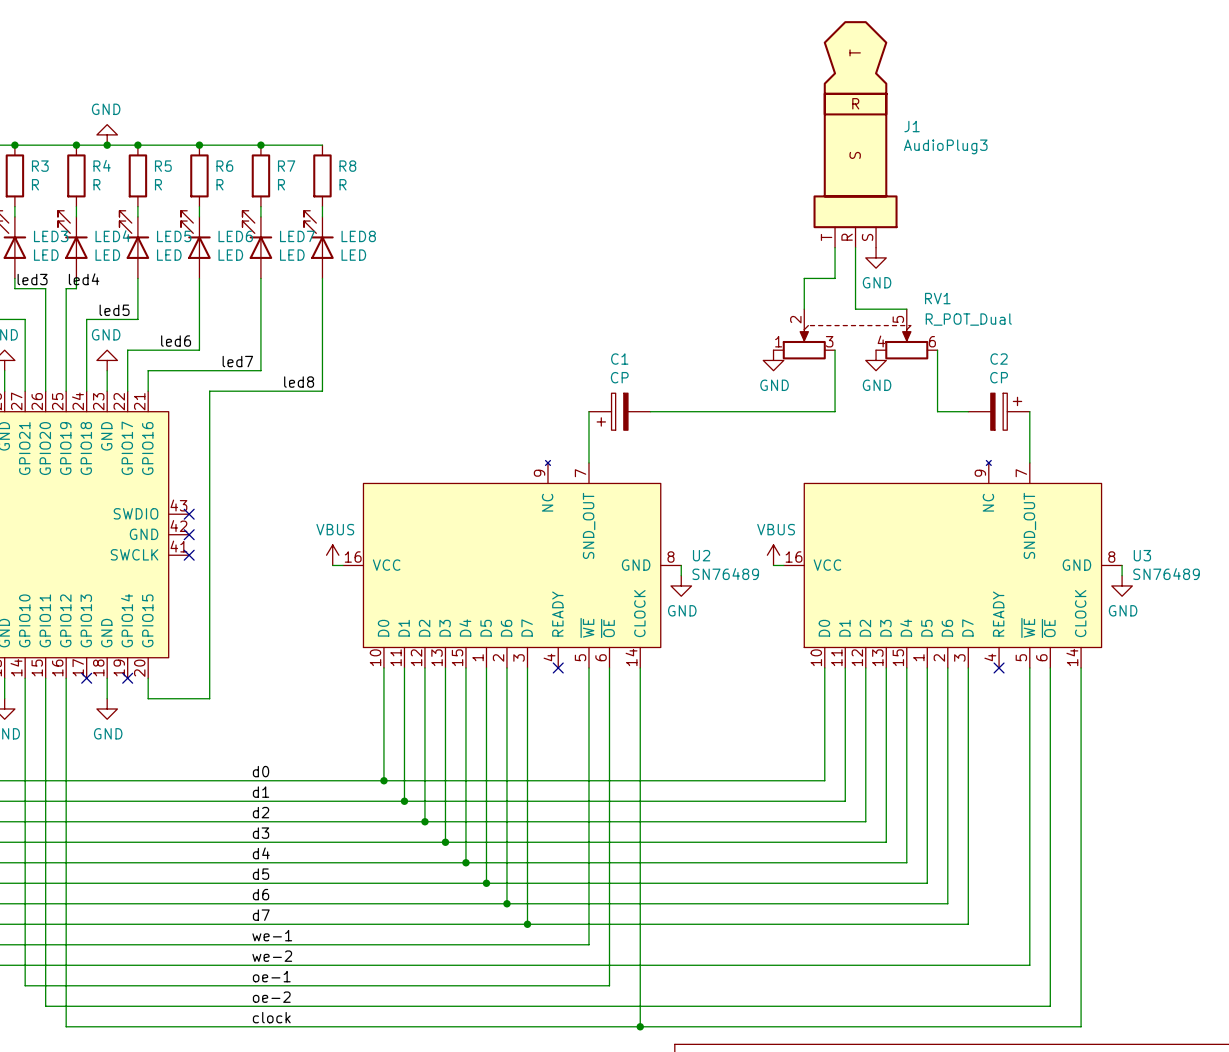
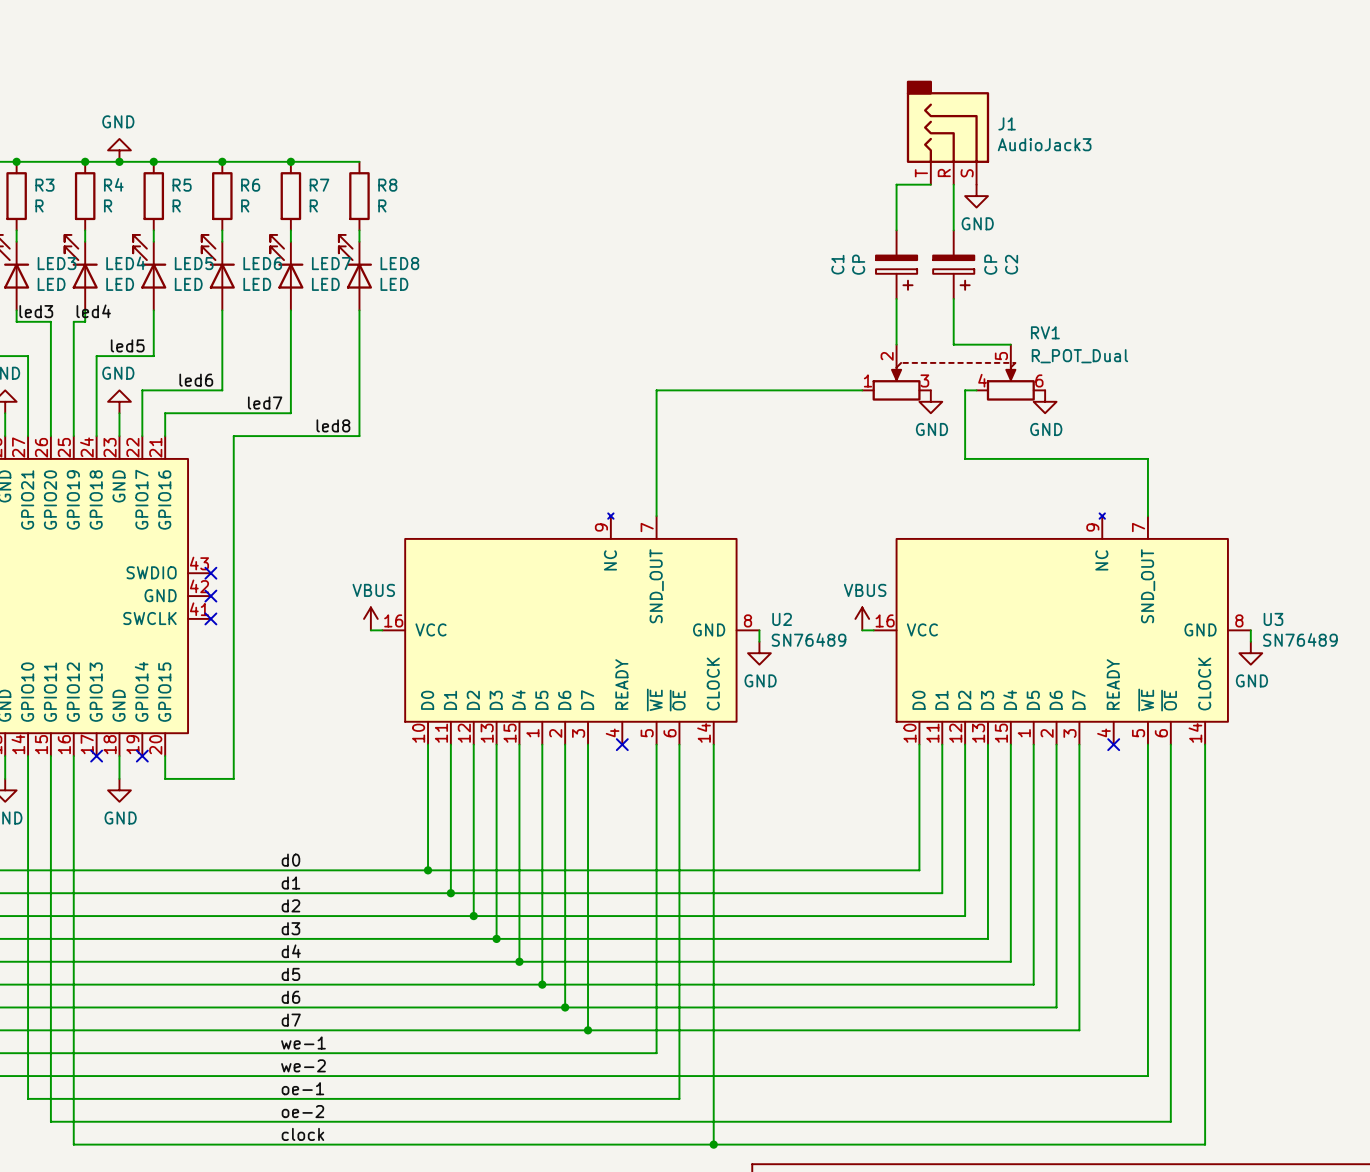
J1 symbol: [813, 21, 898, 248] -> [906, 80, 990, 185]
J1 value: AudioPlug3 (945, 146) -> AudioJack3 (1044, 144)
wire: none -> (930, 184) (896, 184) (896, 230)
power symbol: none -> GND (976, 196)
wire: (835, 247) (835, 278) (804, 278) -> (896, 298) (896, 310)
power symbol: GND (876, 257) -> none
wire: none -> (862, 390) (656, 390) (656, 458)
wire: (835, 350) (835, 411) (650, 411) -> none
wire: (937, 350) (937, 411) -> (976, 390) (965, 390) (965, 458) (1045, 458)
power symbol: GND (773, 360) -> none
power symbol: none -> GND (930, 401)
power symbol: GND (876, 360) -> none
power symbol: none -> GND (1045, 401)
C1 rotation: 0° (612, 411) -> 90° counterclockwise (896, 272)
C1 position: (619, 411) -> (896, 264)
C2 position: (999, 411) -> (953, 264)
C2 rotation: 0° (1006, 411) -> 90° clockwise (953, 272)

